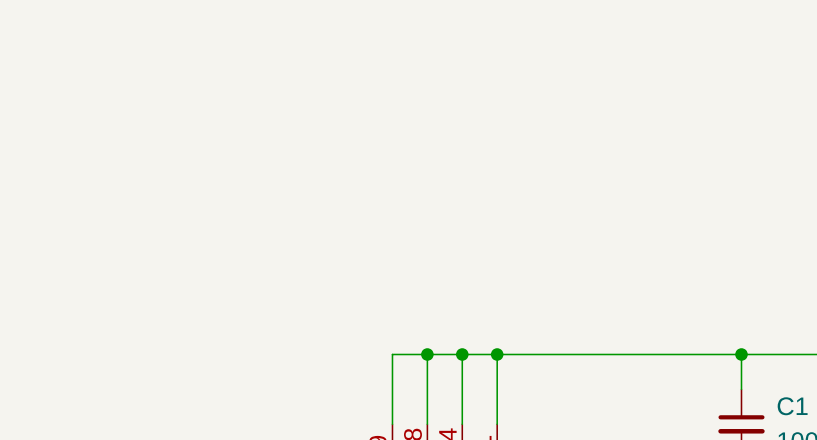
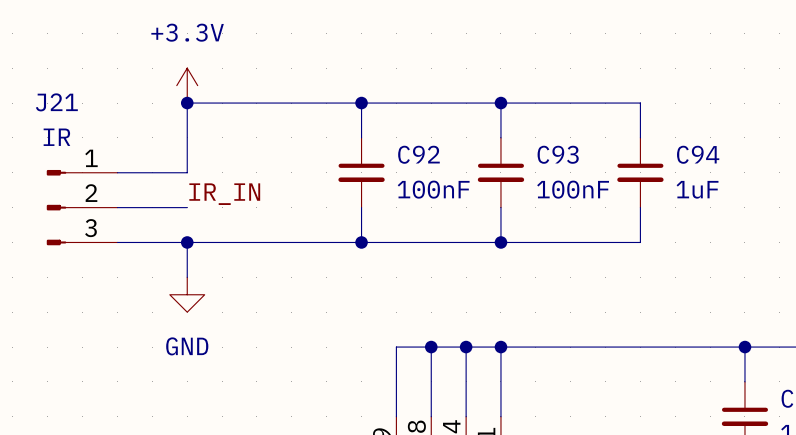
power symbol: none -> +3.3V (187, 85)
junction: none -> (187, 103)
wire: none -> (361, 103) (361, 137)
junction: none -> (361, 103)
wire: none -> (500, 103) (500, 137)
junction: none -> (500, 103)
wire: none -> (640, 137) (640, 103) (187, 103) (187, 172) (117, 172)
C92: none -> 100nF (361, 172)
C93: none -> 100nF (500, 172)
C94: none -> 1uF (640, 172)
label: none -> IR_IN (224, 194)
J21: none -> IR (82, 207)
wire: none -> (117, 207) (187, 207)
wire: none -> (361, 207) (361, 242)
wire: none -> (500, 207) (500, 242)
wire: none -> (640, 207) (640, 242) (117, 242)
wire: none -> (187, 242) (187, 277)
junction: none -> (187, 242)
junction: none -> (361, 242)
junction: none -> (500, 242)
power symbol: none -> GND (187, 294)

